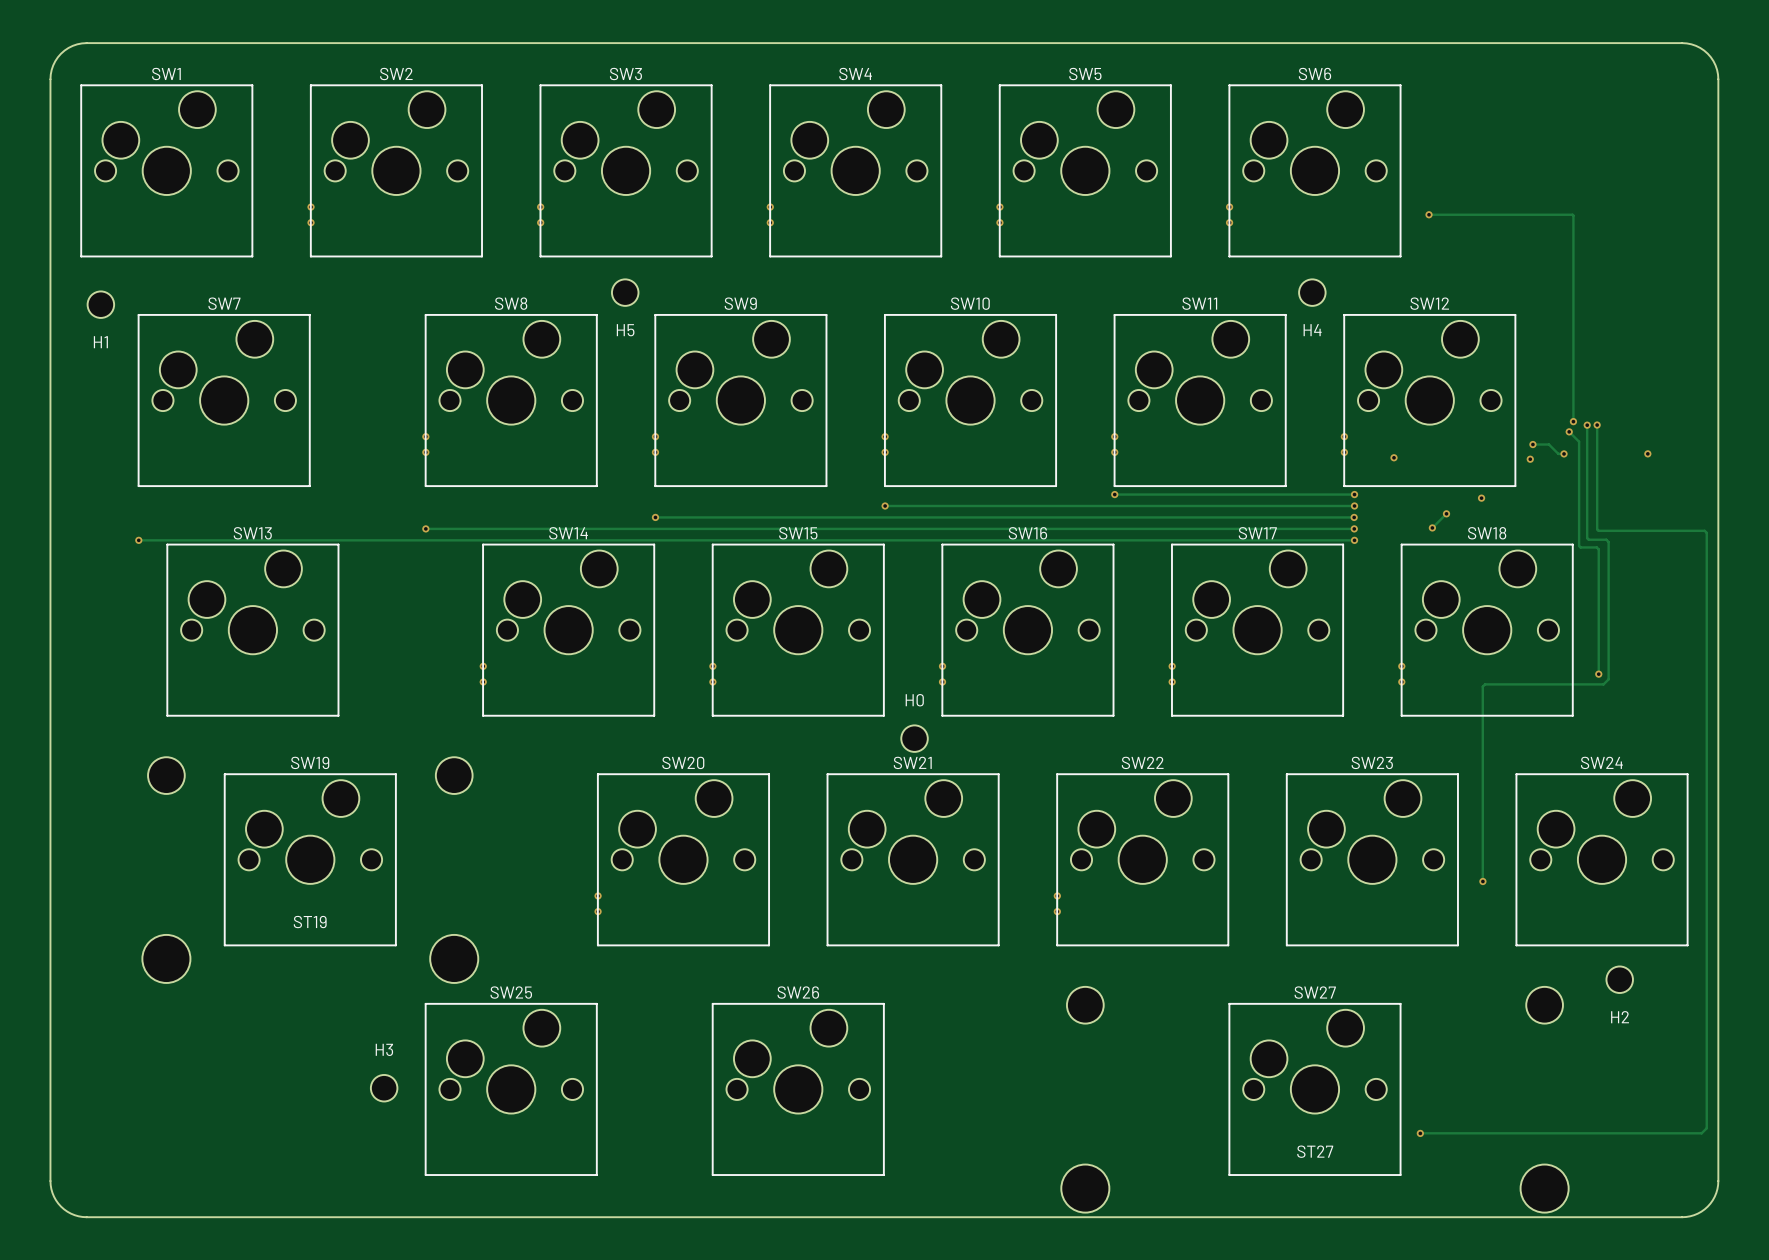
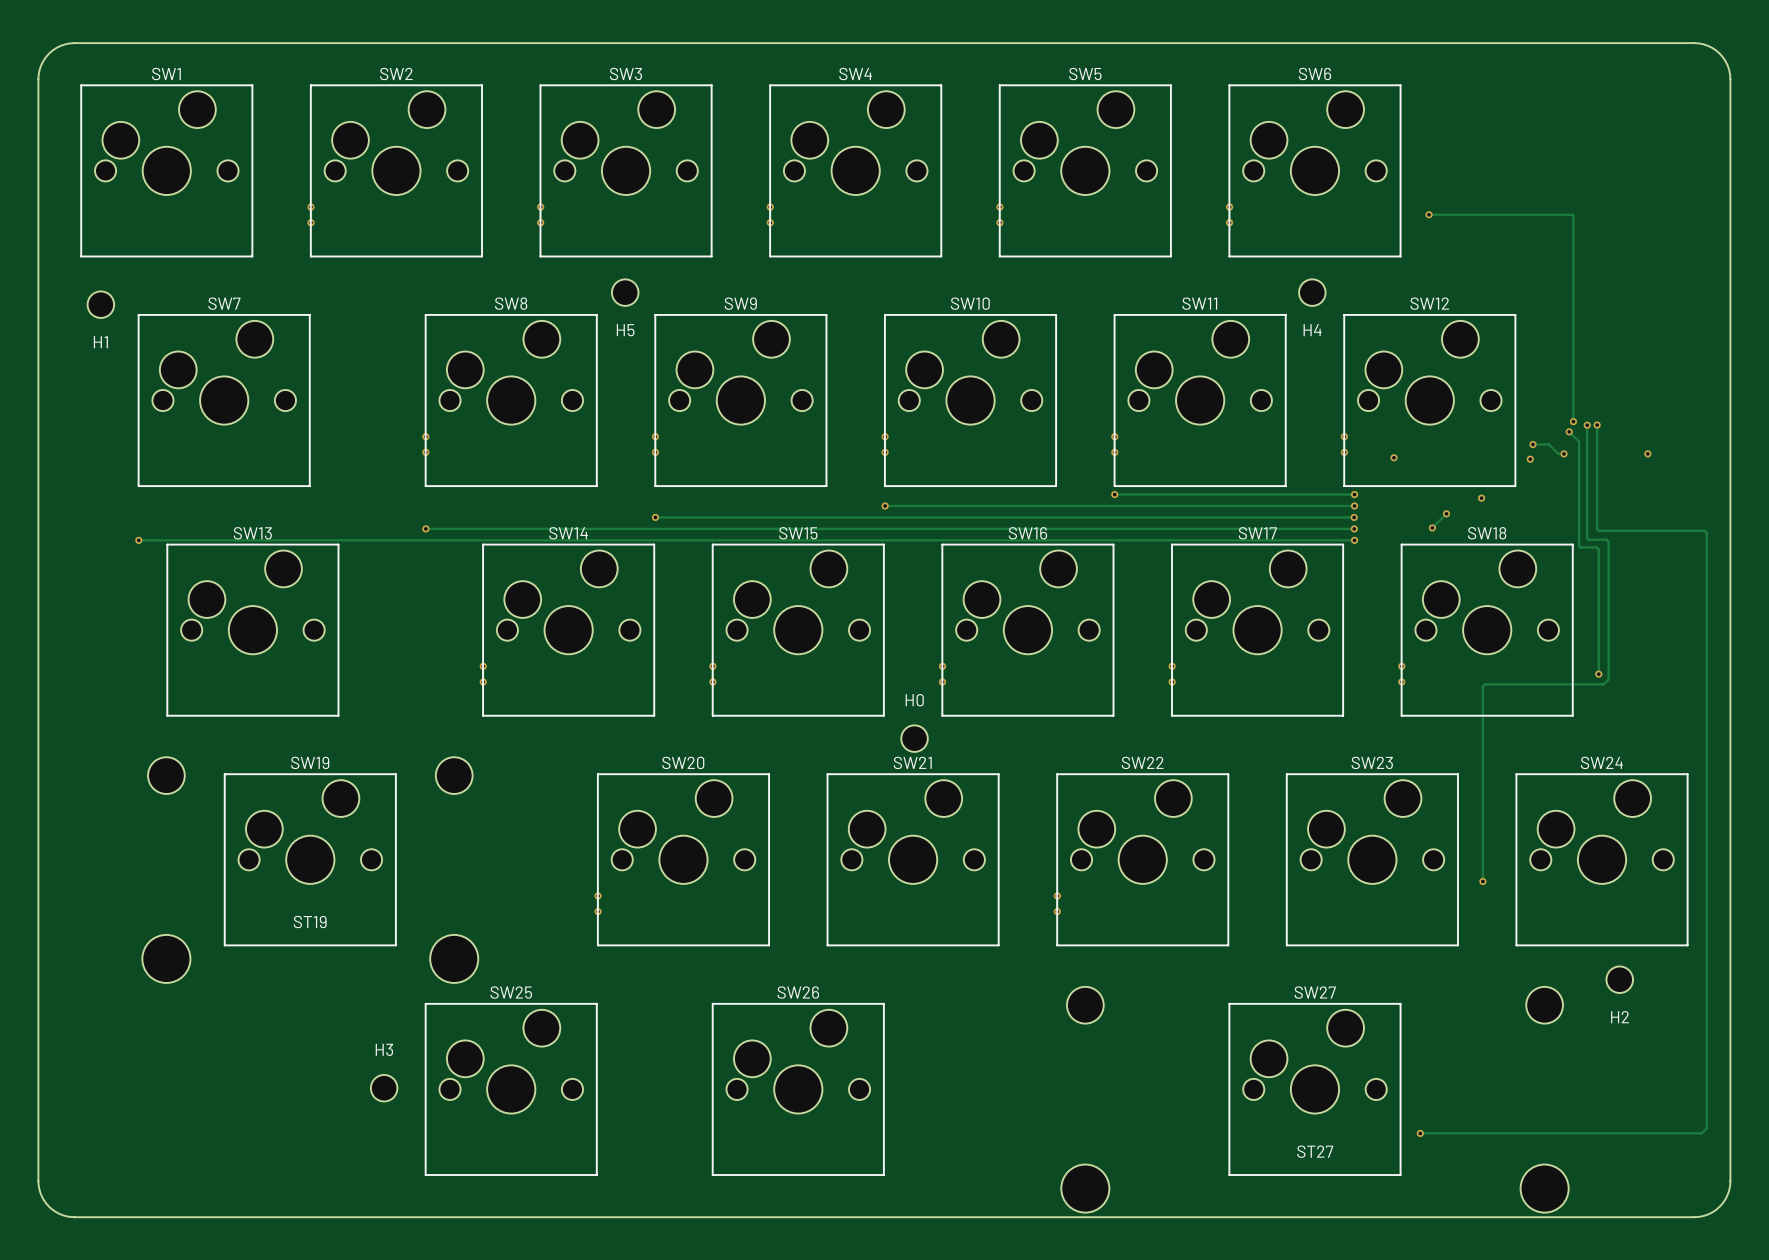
board edge: (86, 43) (72, 45) (61, 53) (53, 65) (50, 79) (50, 1181) (52, 1192) (61, 1206) (70, 1213) (86, 1217) -> (86, 43) (65, 44) (52, 50) (43, 61) (38, 79) (38, 1181) (41, 1196) (52, 1209) (66, 1216) (86, 1217)
board edge: (1682, 43) (1696, 45) (1707, 53) (1715, 65) (1718, 79) (1718, 1181) (1716, 1192) (1707, 1206) (1694, 1215) (1682, 1217) -> (1682, 43) (1703, 44) (1716, 50) (1727, 65) (1730, 79) (1730, 1181) (1726, 1196) (1716, 1209) (1702, 1216) (1682, 1217)

